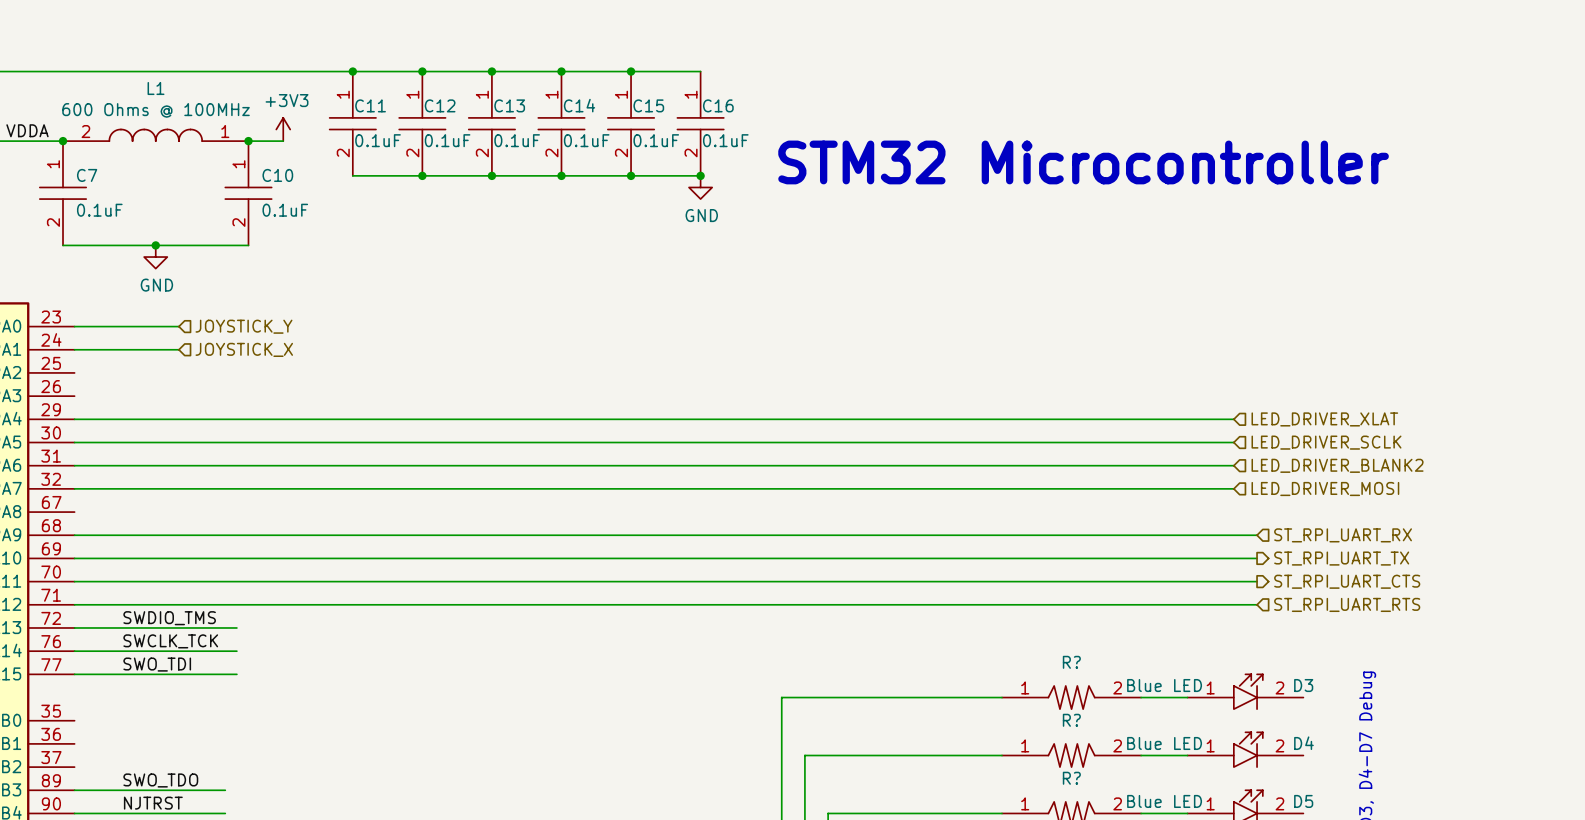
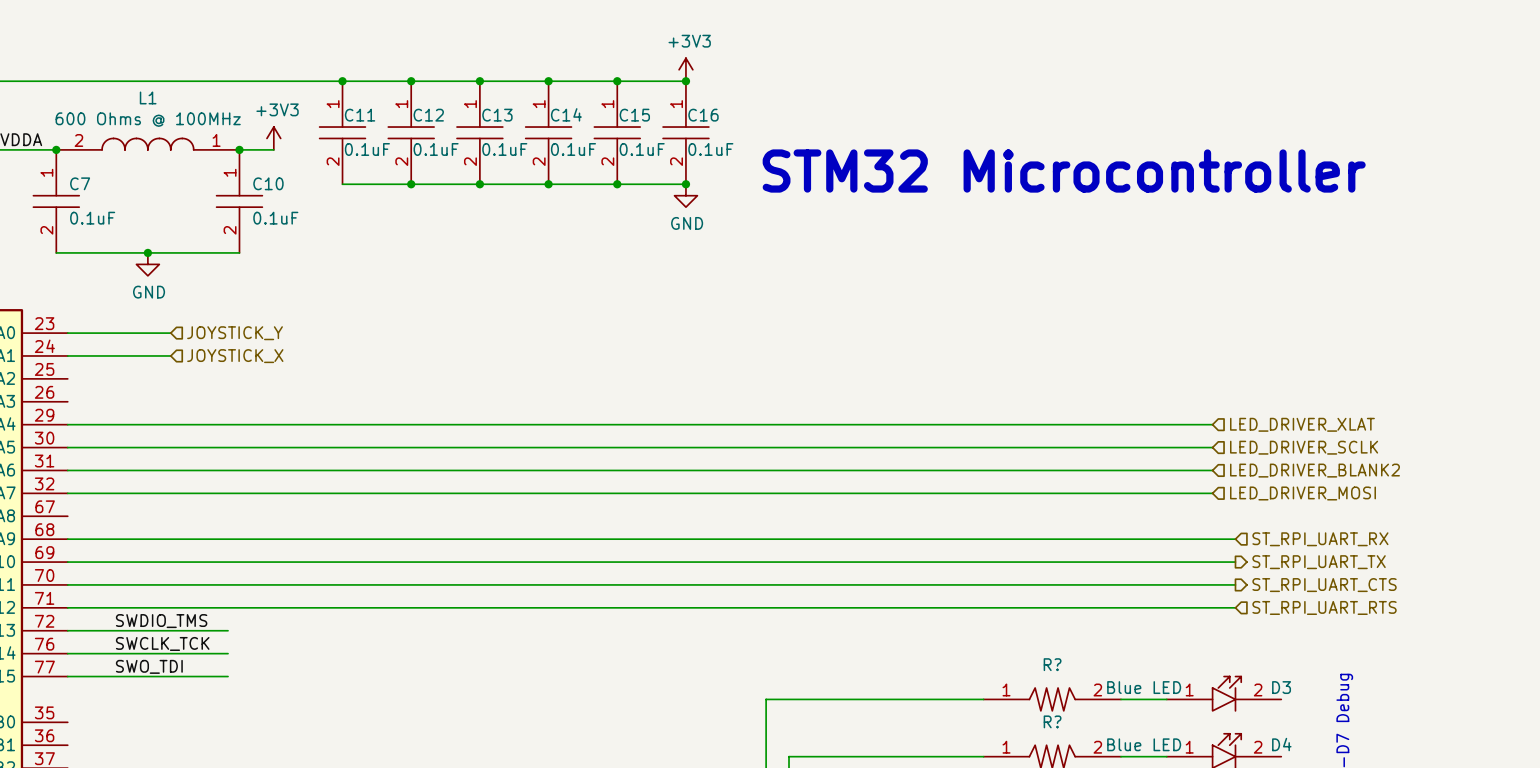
power symbol: none -> +3V3 (685, 69)
junction: none -> (685, 81)

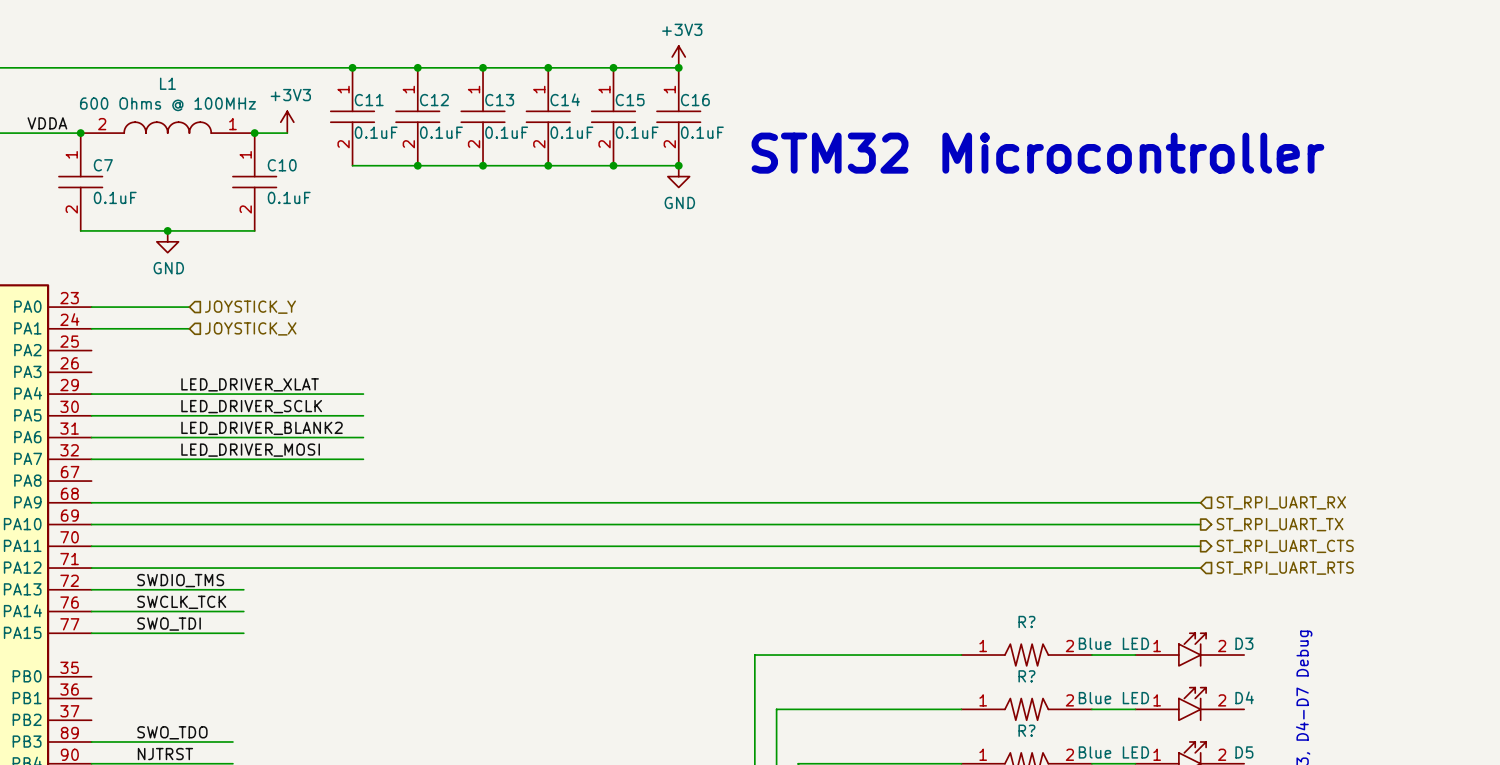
label: none -> LED_DRIVER_XLAT (250, 384)
wire: (353, 424) (1212, 424) -> none
hierarchical label: LED_DRIVER_XLAT (1302, 424) -> none
label: none -> LED_DRIVER_SCLK (251, 406)
wire: (353, 447) (1212, 447) -> none
hierarchical label: LED_DRIVER_SCLK (1304, 447) -> none
label: none -> LED_DRIVER_BLANK2 (262, 428)
wire: (353, 470) (1212, 470) -> none
hierarchical label: LED_DRIVER_BLANK2 (1314, 470) -> none
label: none -> LED_DRIVER_MOSI (250, 450)
wire: (353, 493) (1212, 493) -> none
hierarchical label: LED_DRIVER_MOSI (1302, 493) -> none

